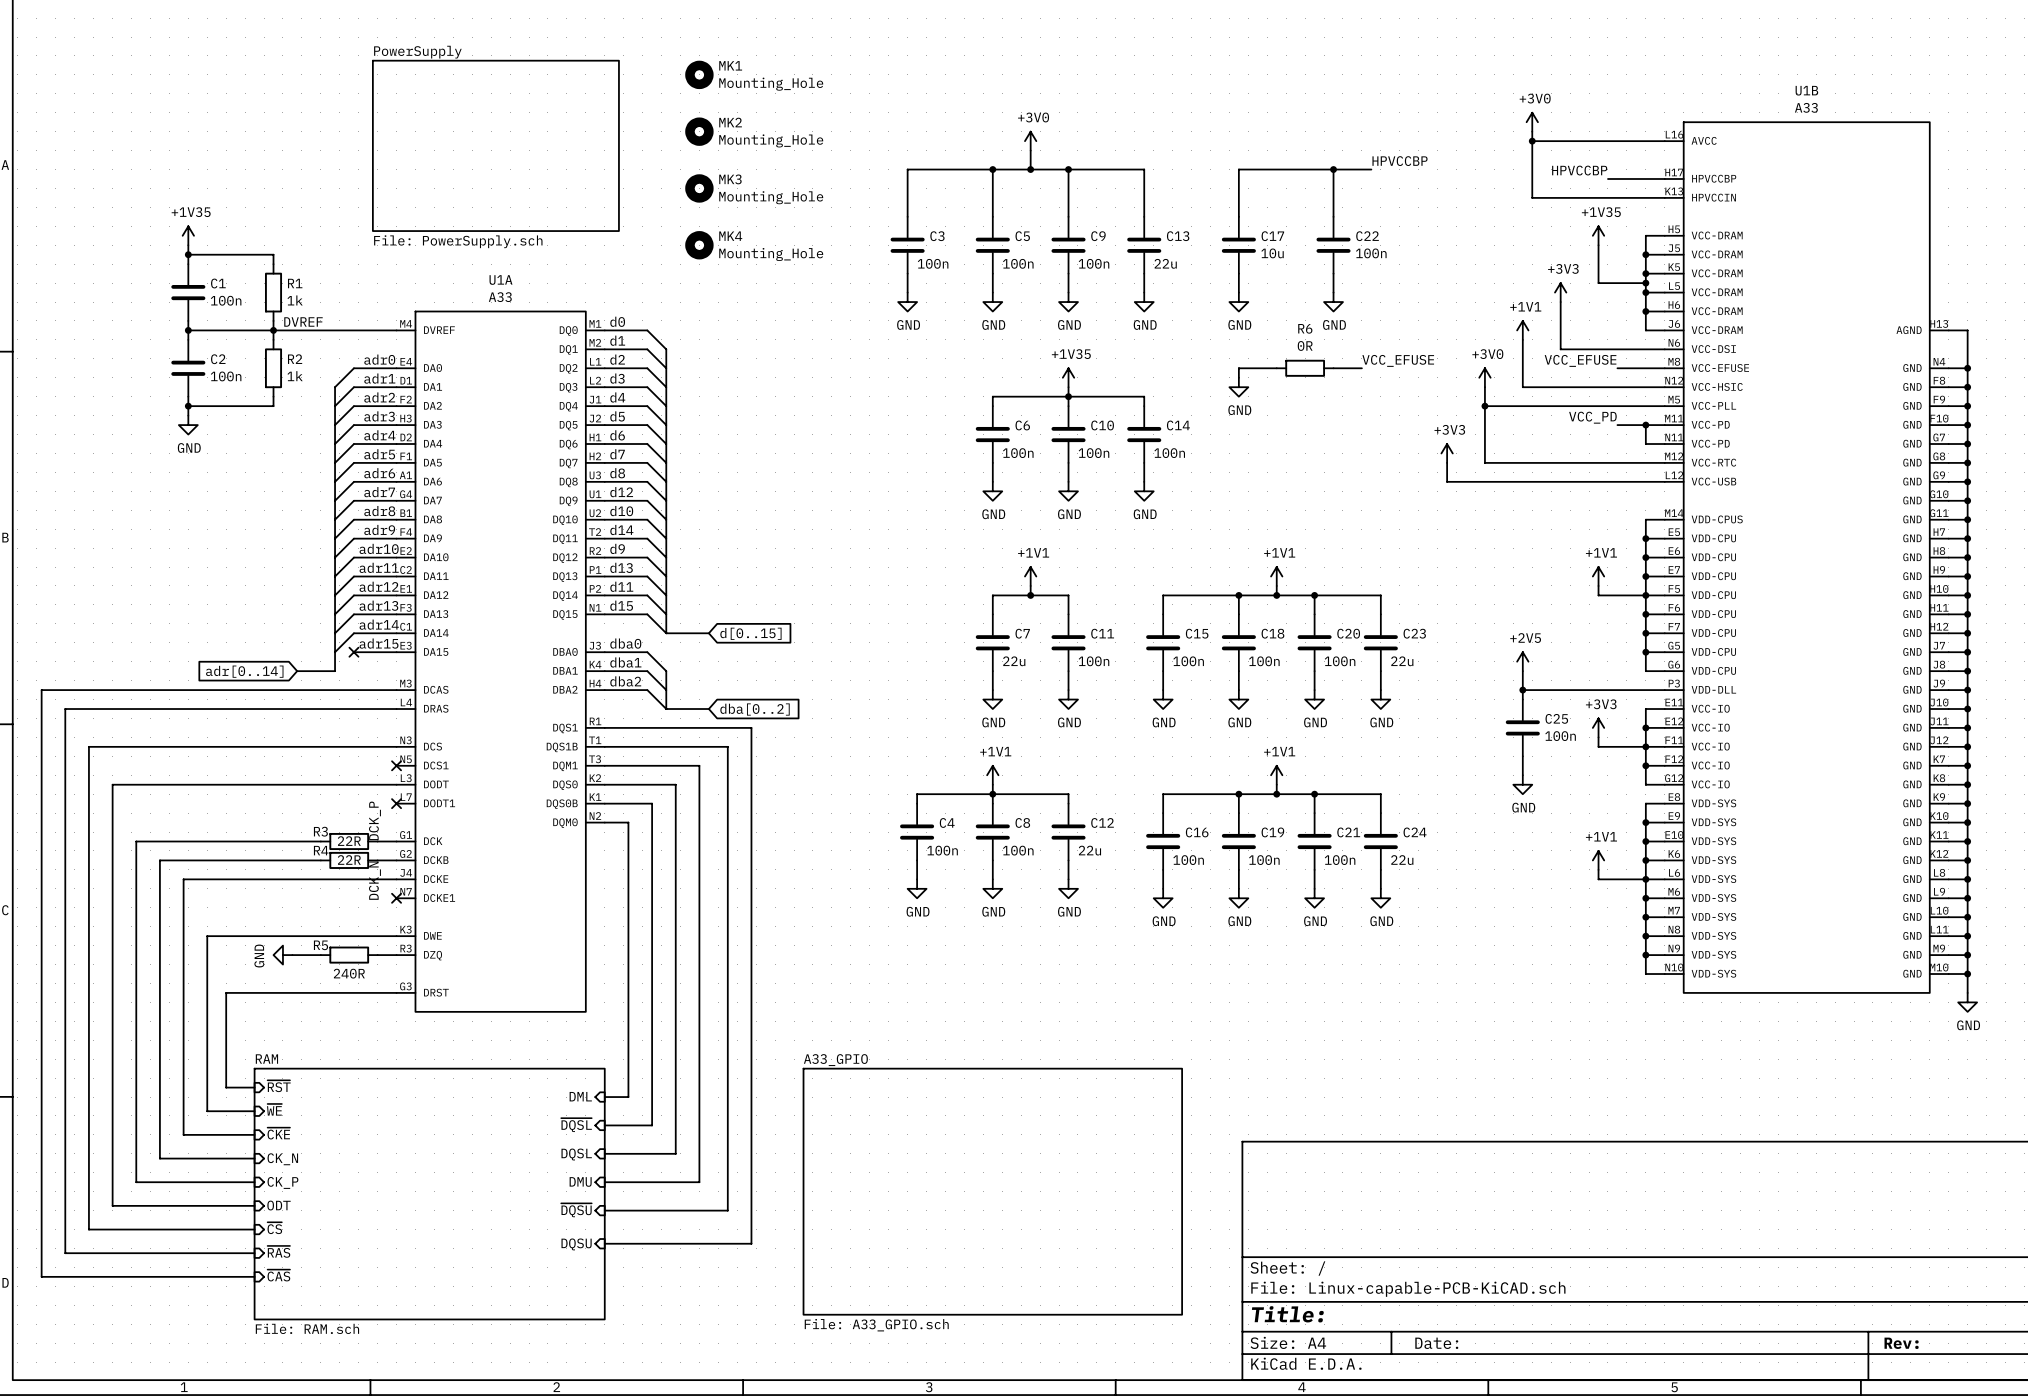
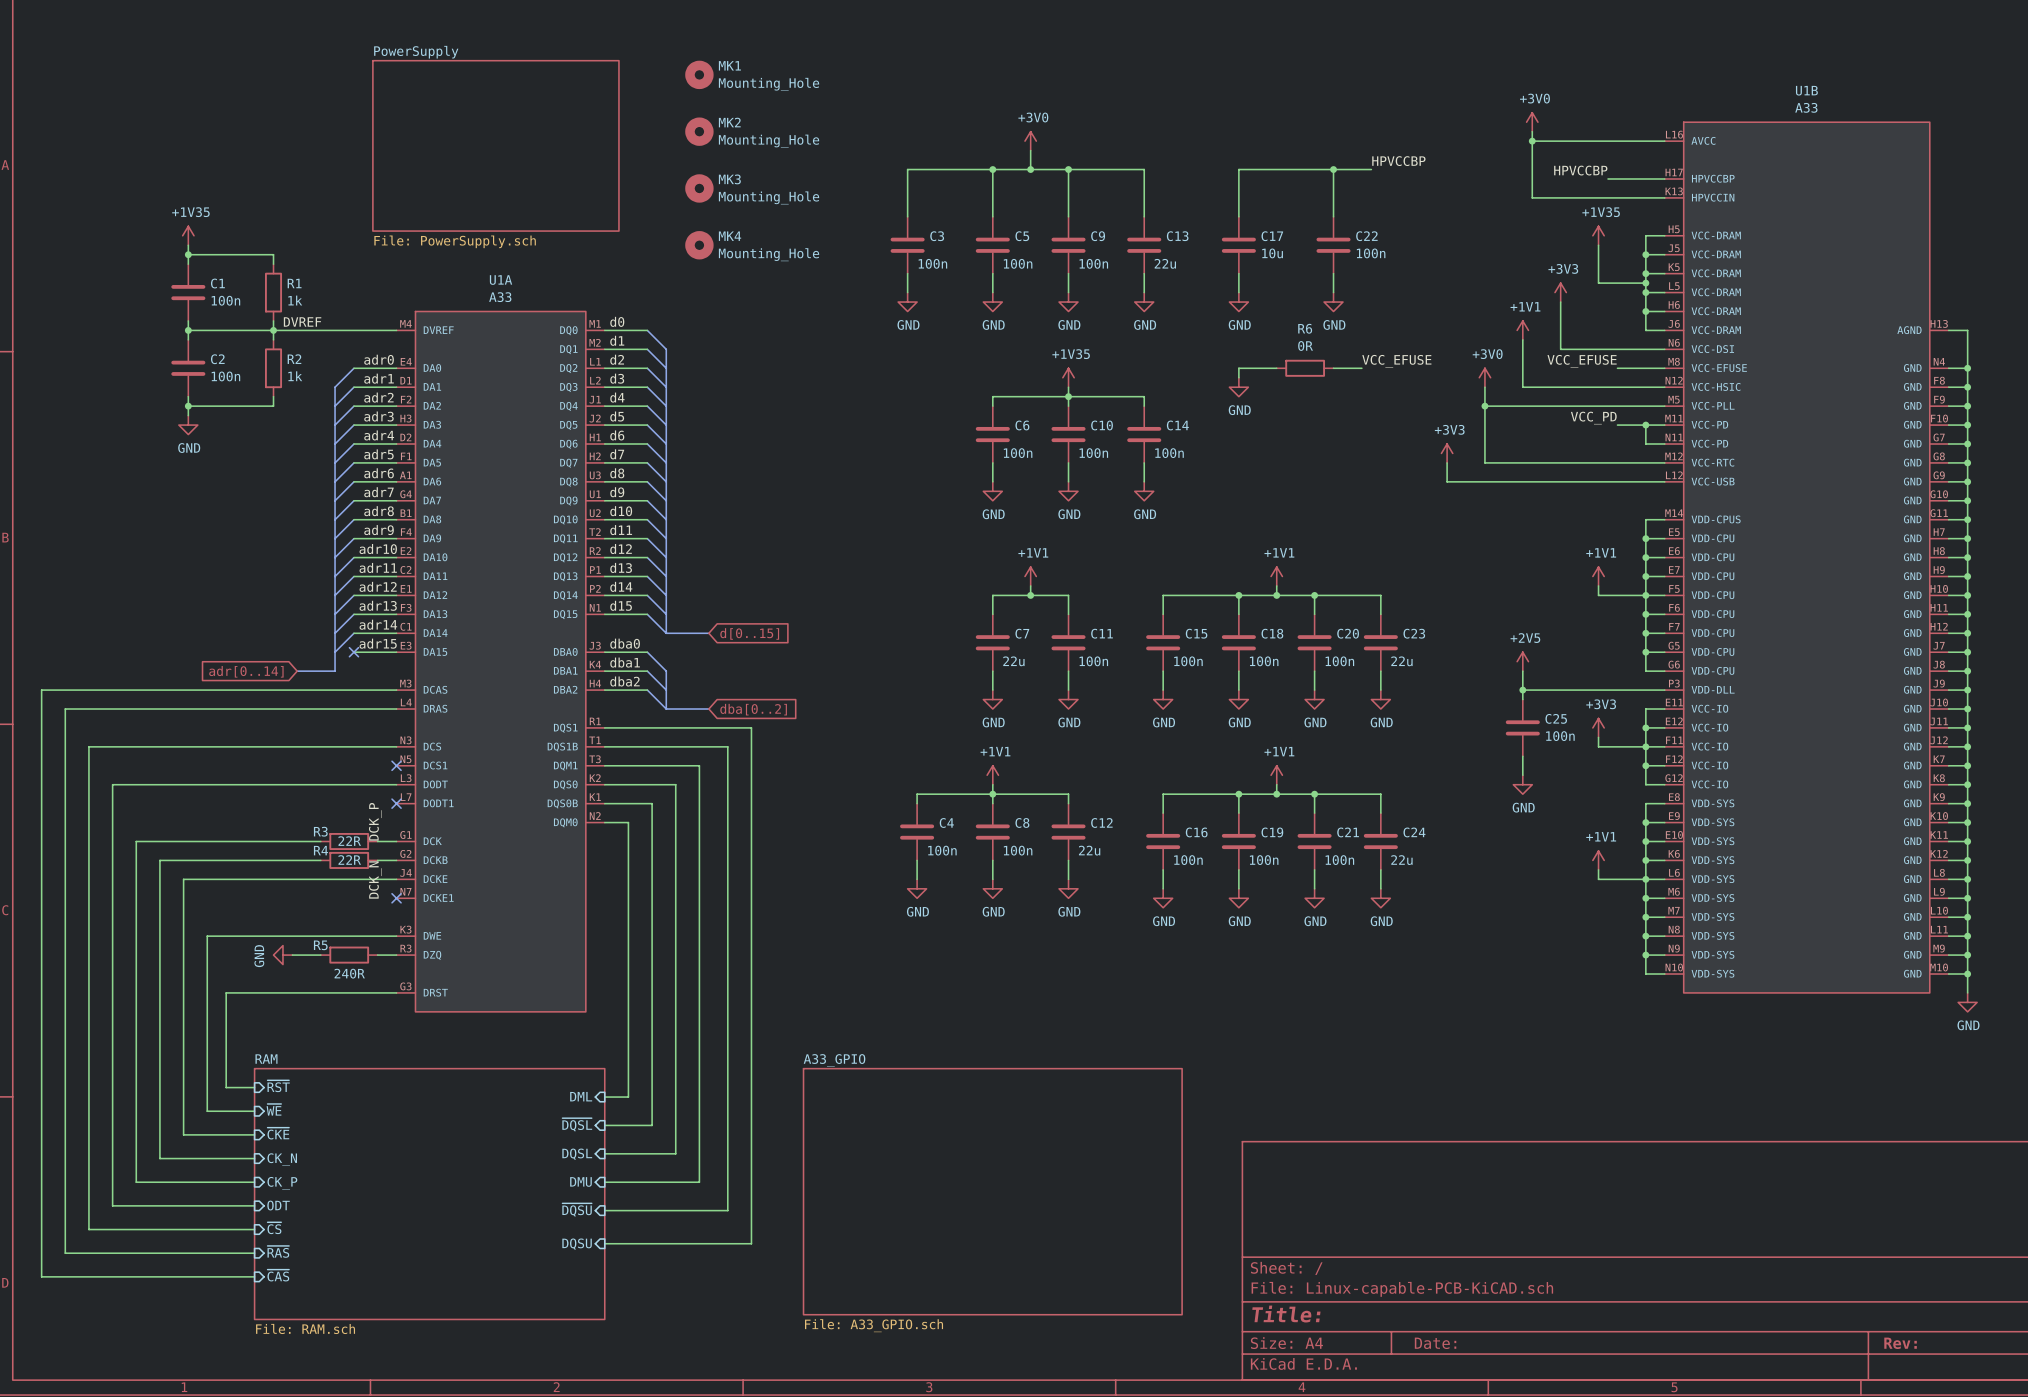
label: d12 (621, 492) -> d9 (617, 492)
label: d14 (621, 529) -> d11 (621, 530)
label: d9 (617, 548) -> d12 (621, 549)
label: d11 (621, 586) -> d14 (621, 586)

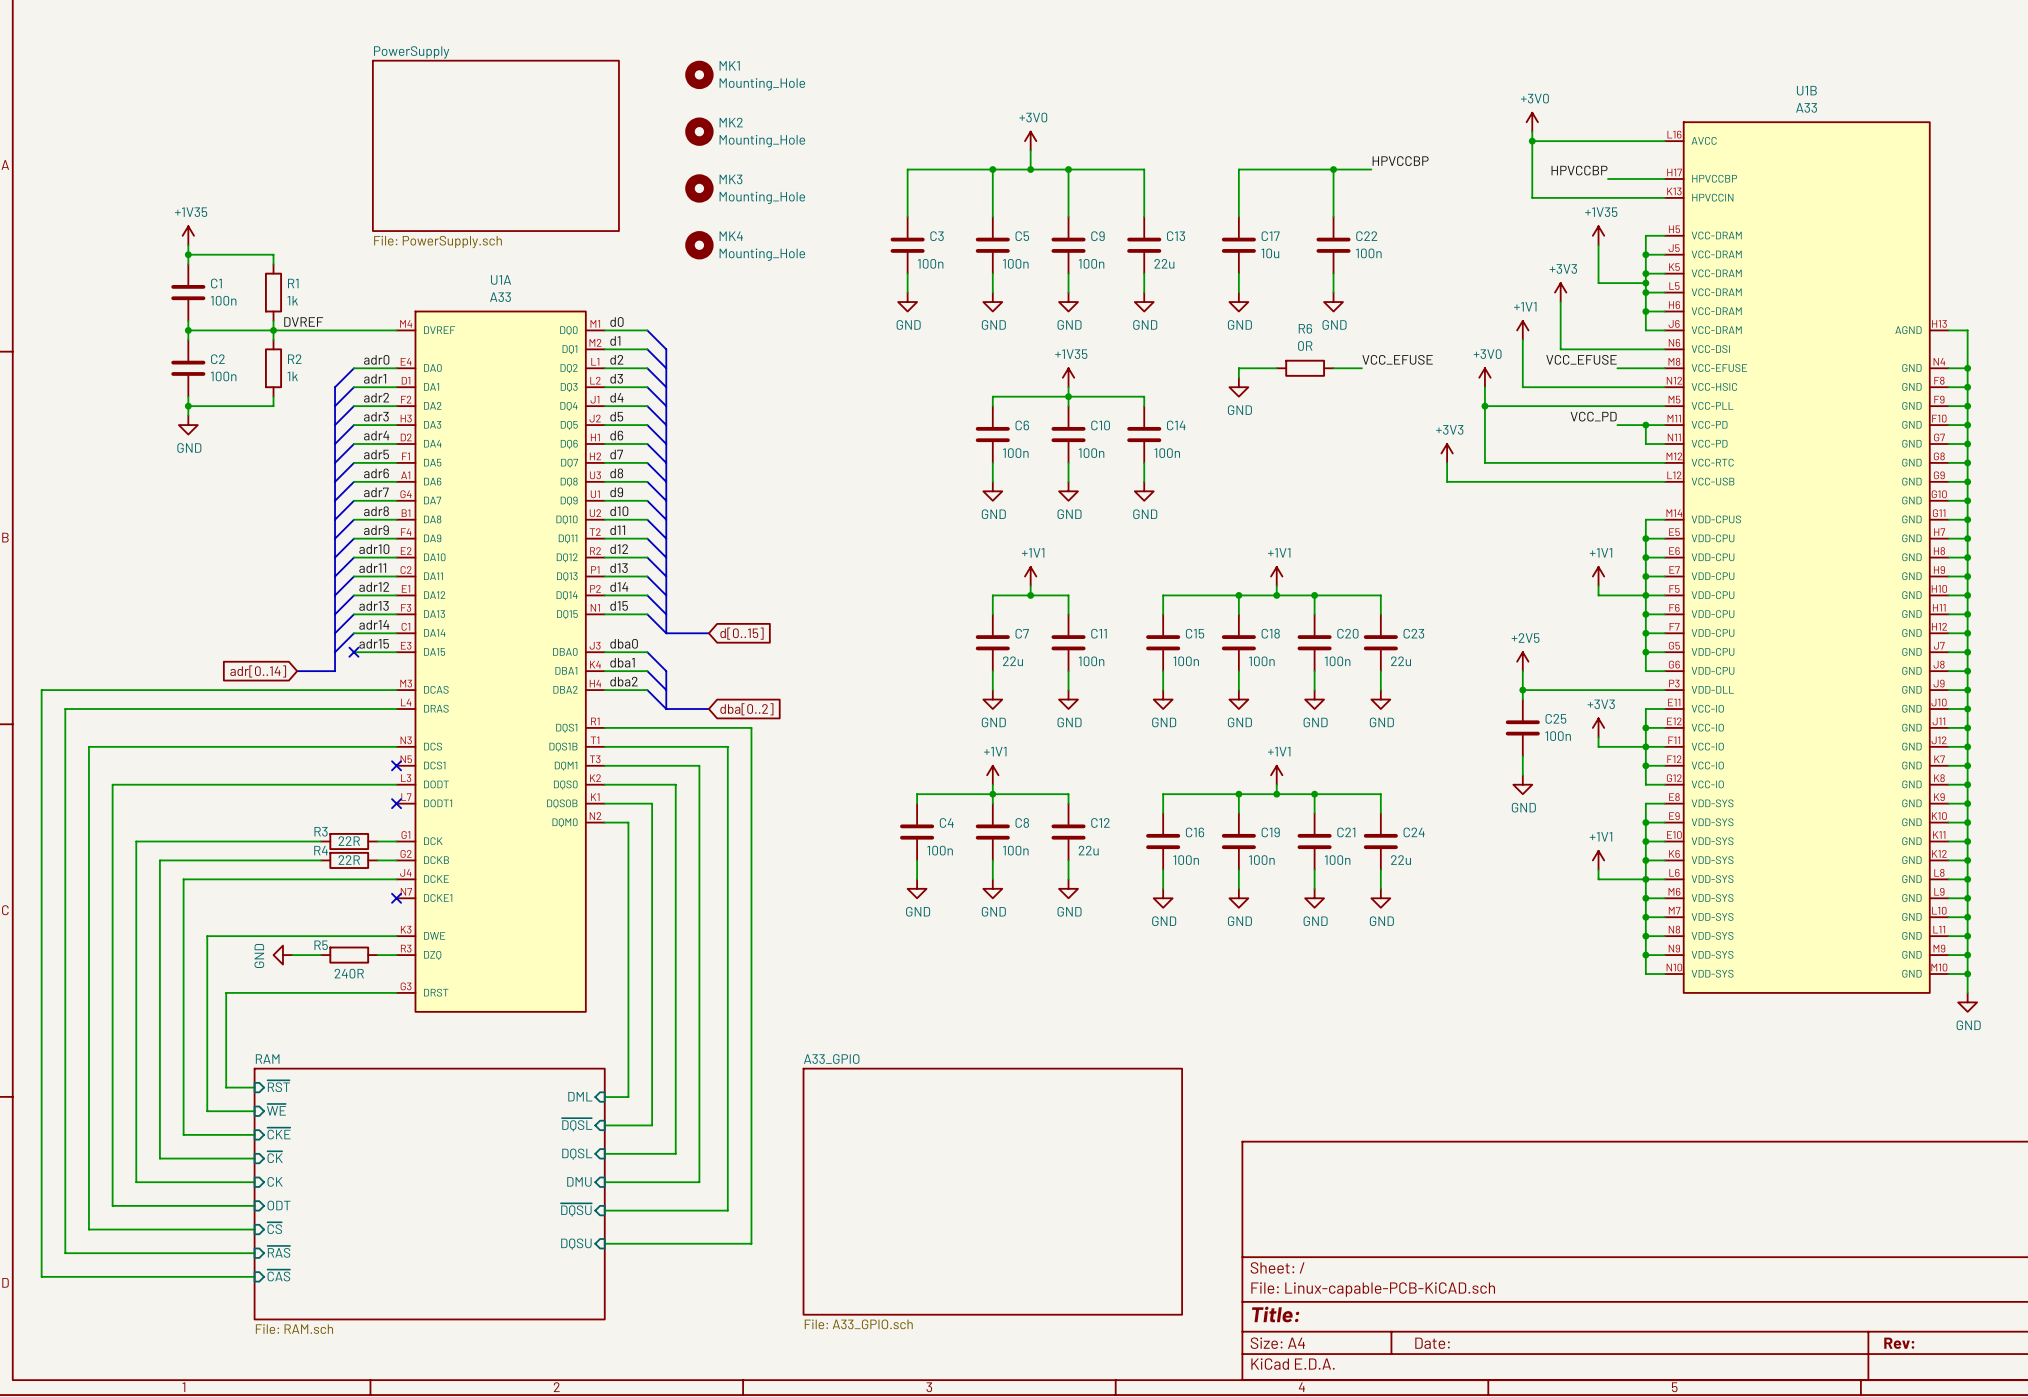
label: DCK_P (375, 821) -> none
label: DCK_N (375, 879) -> none
sheet pin: CK_N (282, 1159) -> ~{CK} (275, 1157)
sheet pin: CK_P (282, 1183) -> CK (275, 1181)

